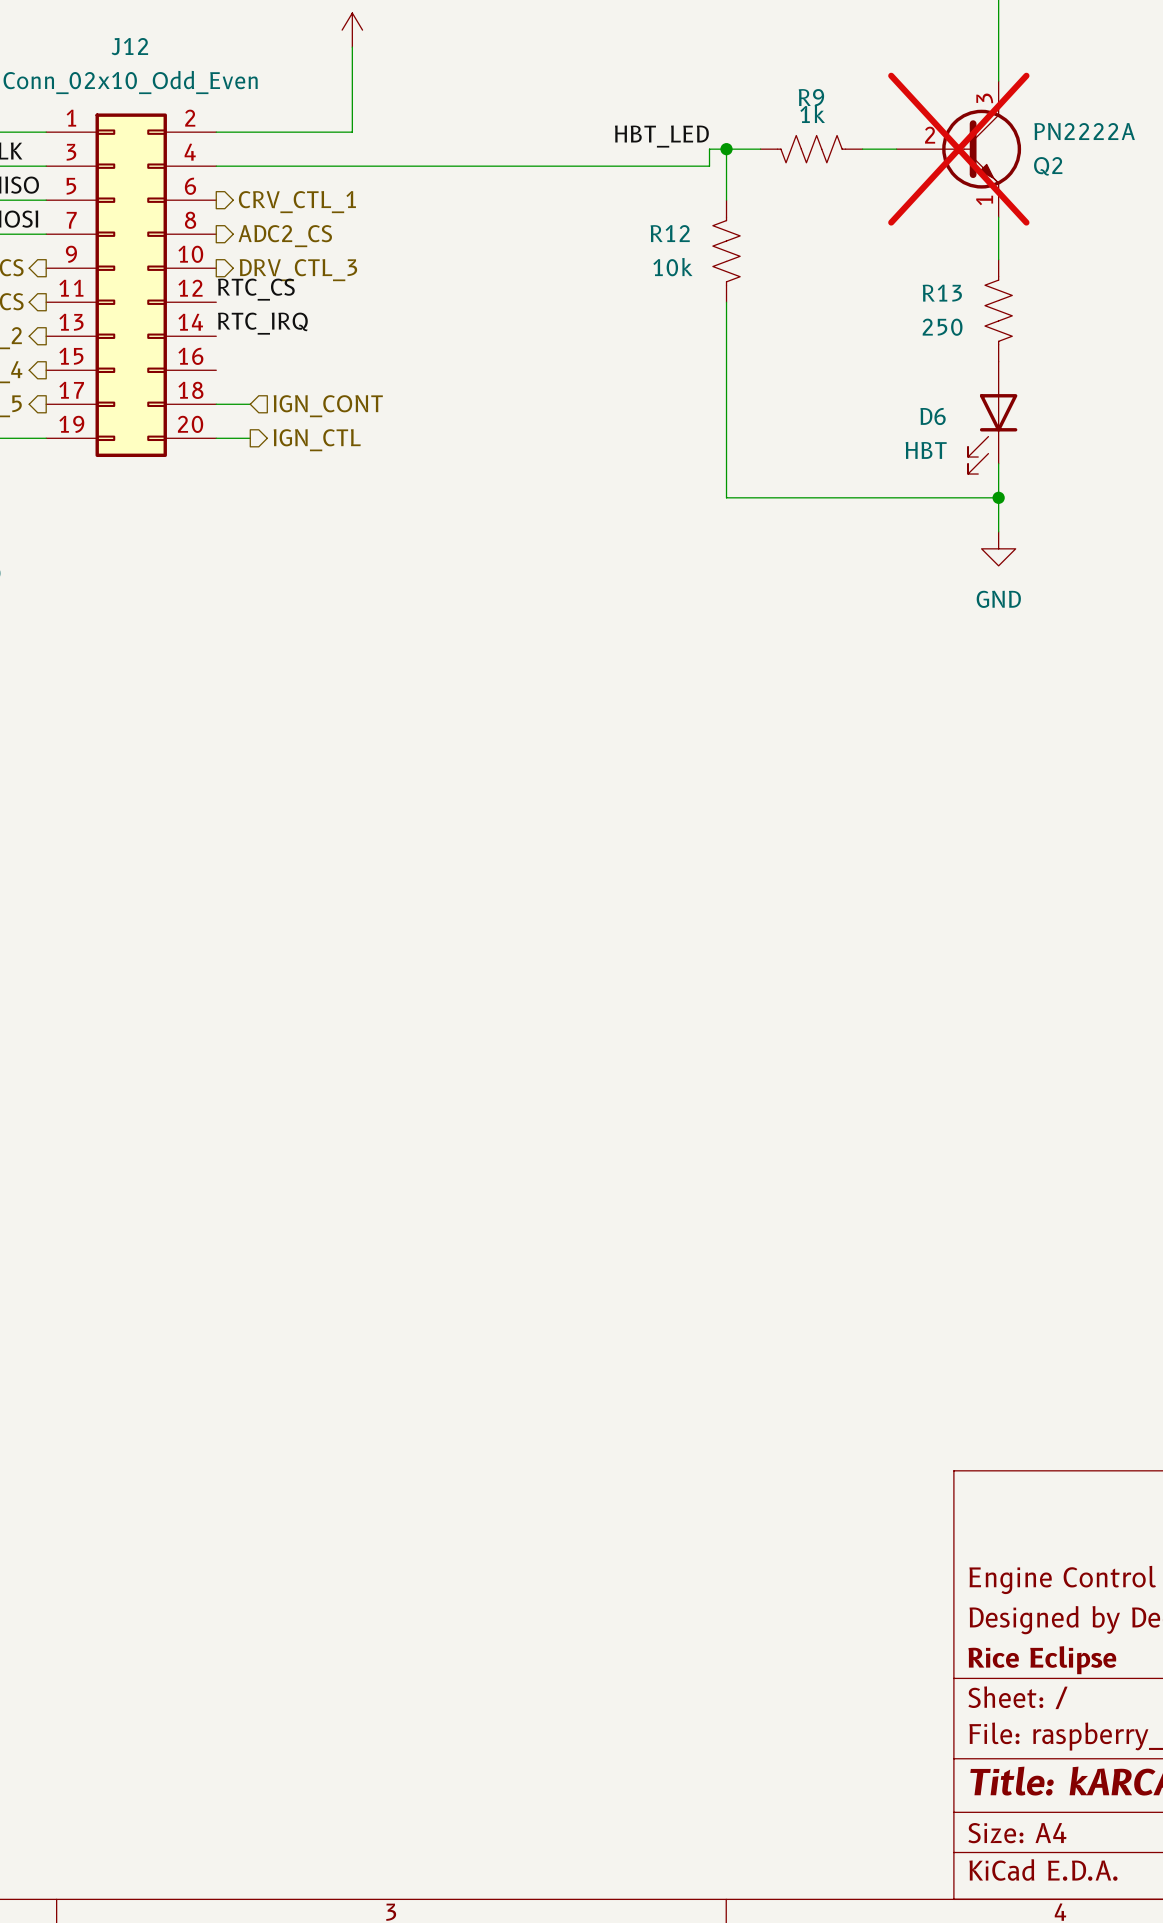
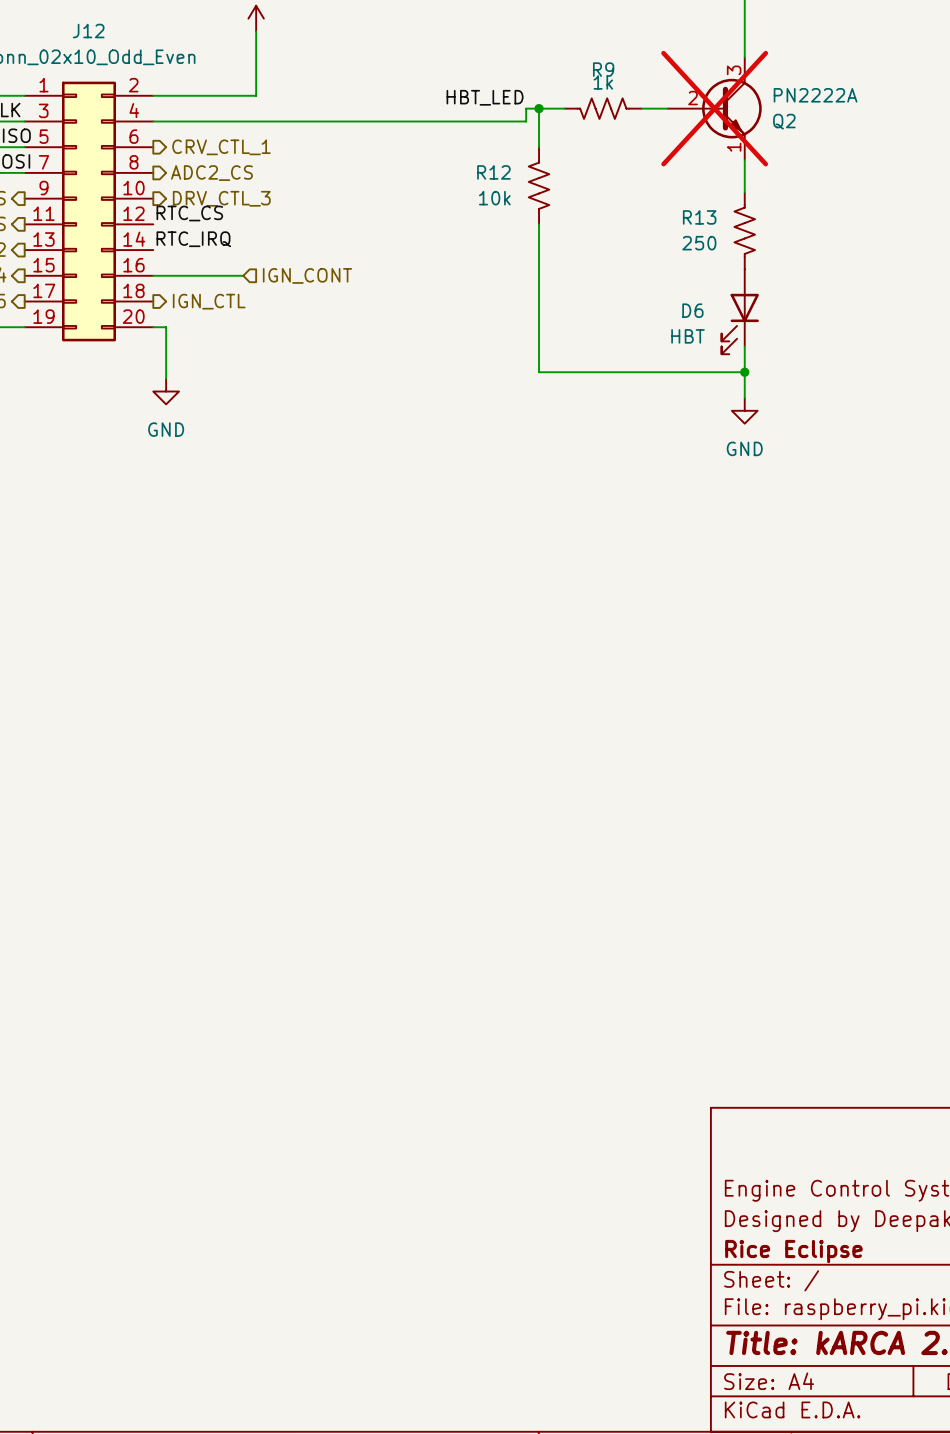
wire: none -> (153, 275) (243, 275)
wire: (216, 404) (250, 404) -> none
hierarchical label position: IGN_CONT (328, 406) -> IGN_CONT (307, 275)
wire: (233, 438) (250, 438) -> (166, 327) (166, 378)
hierarchical label position: IGN_CTL (317, 440) -> IGN_CTL (209, 301)
power symbol: none -> GND (166, 391)

